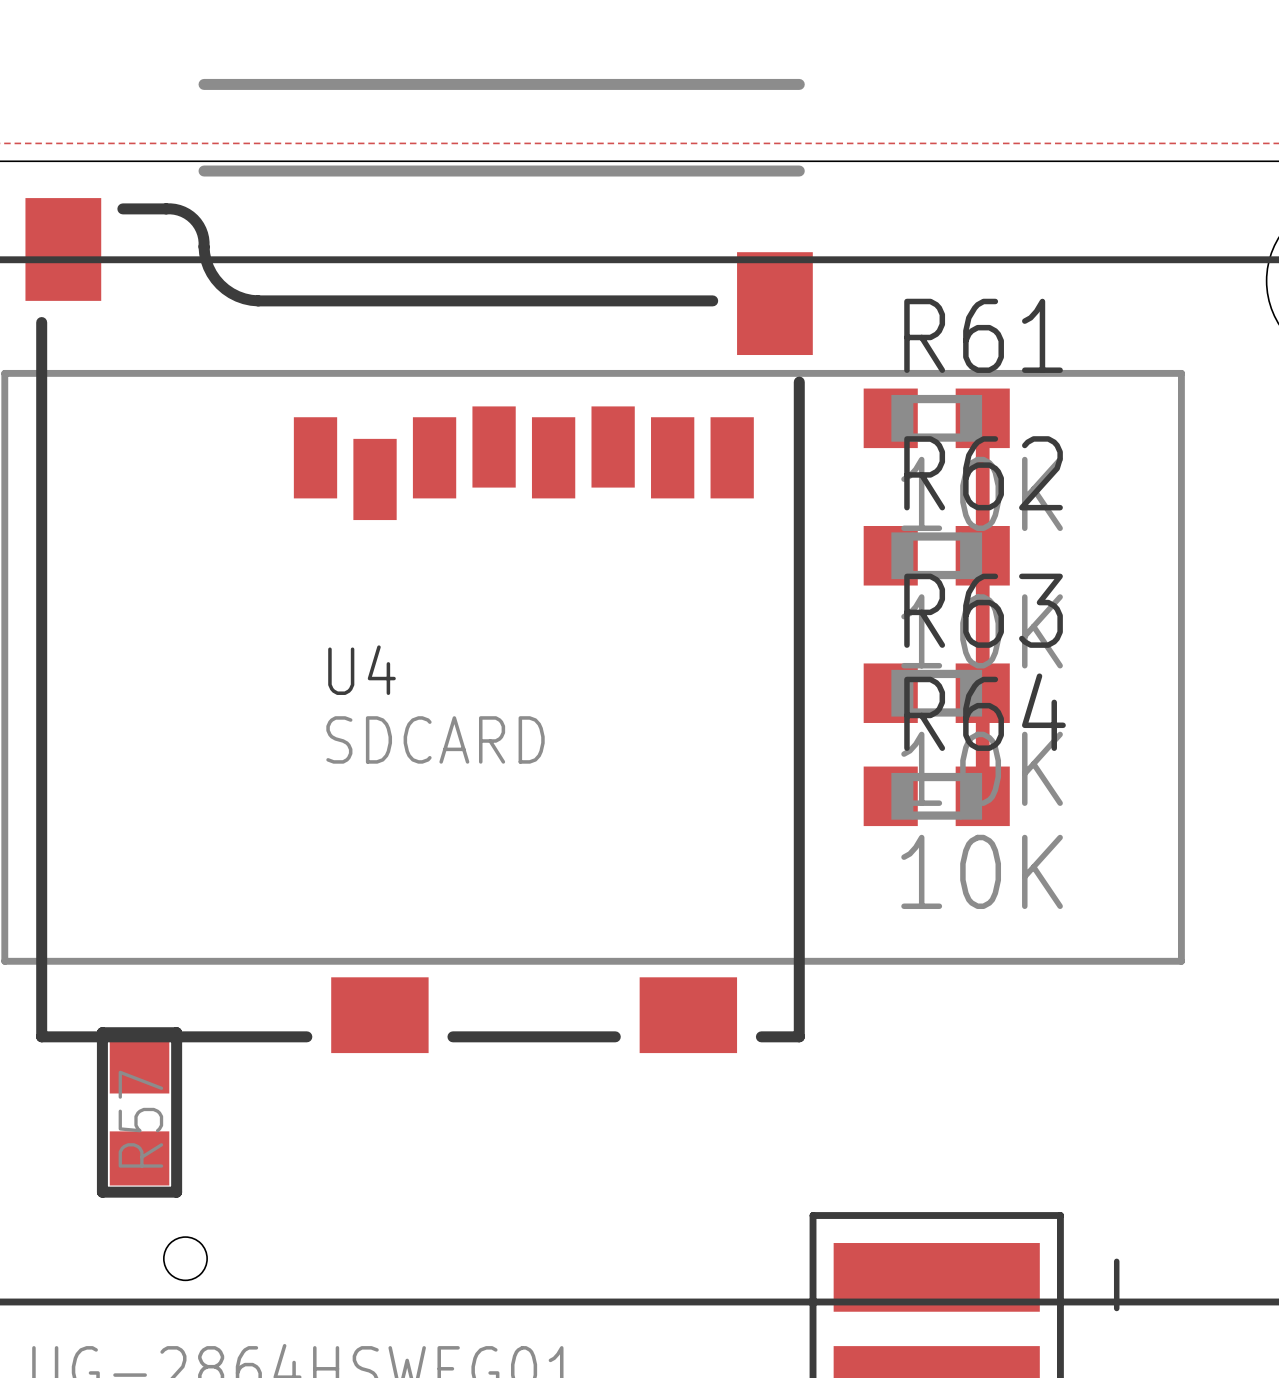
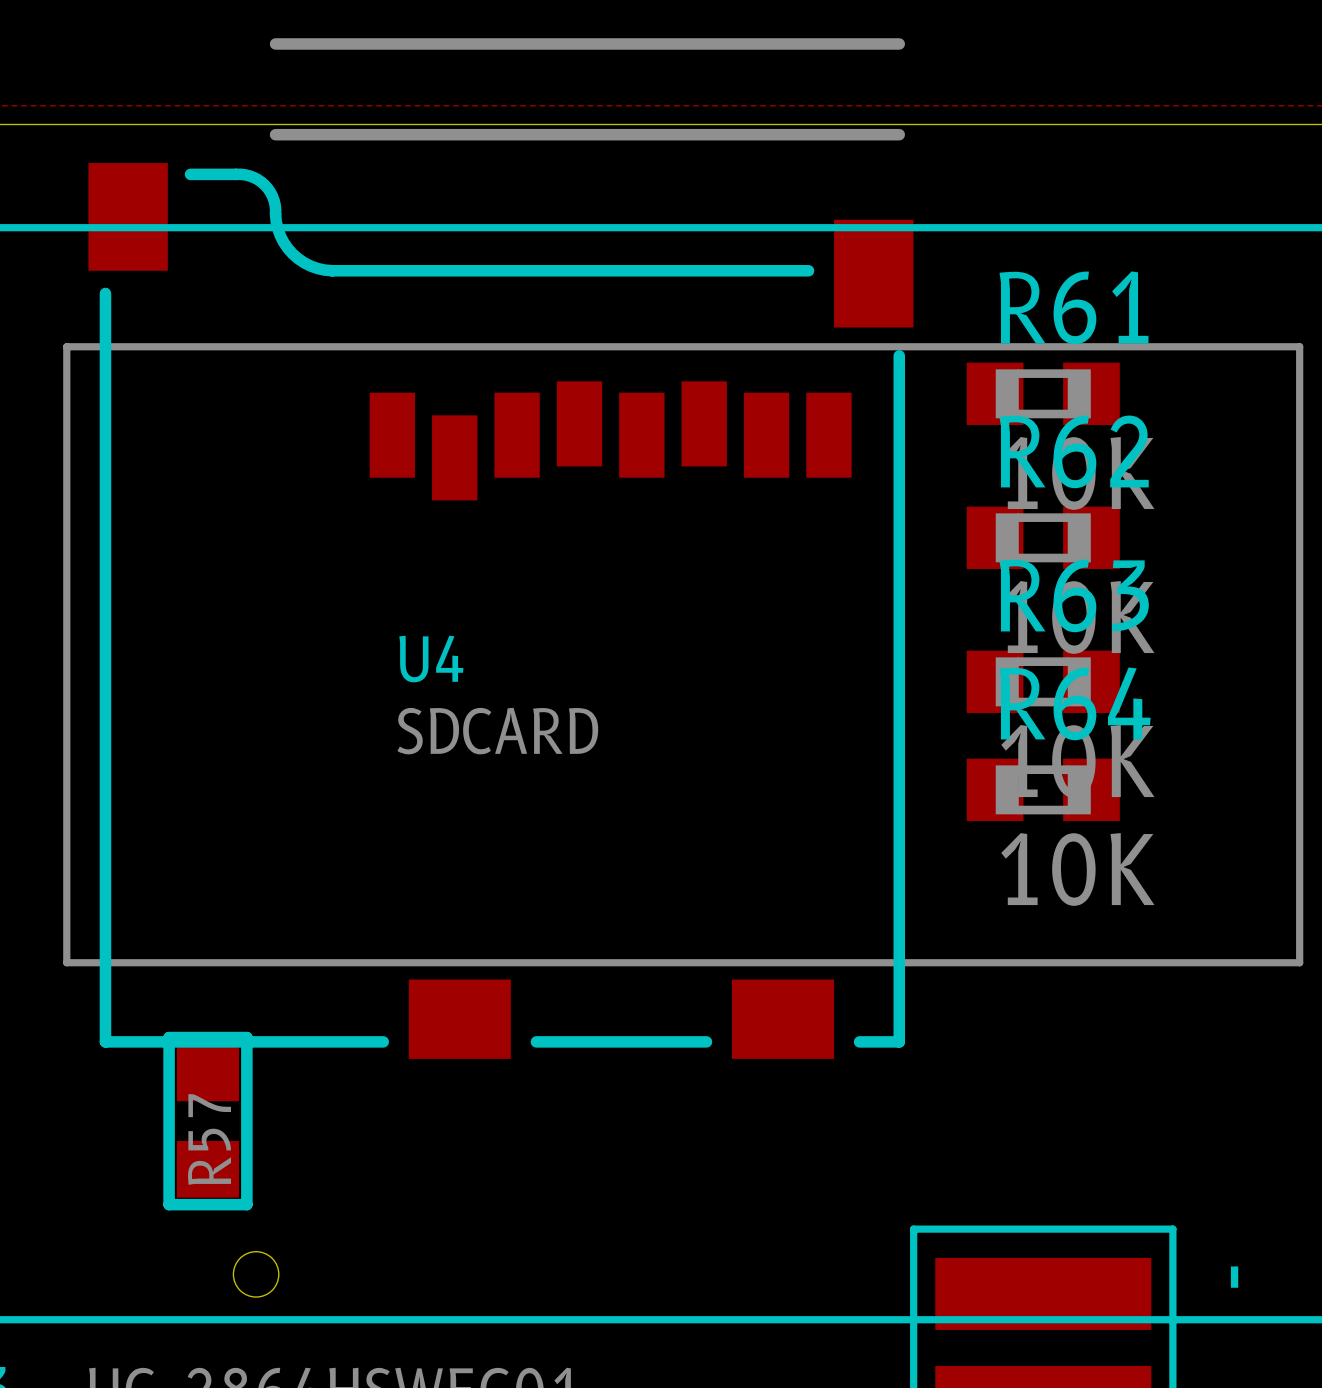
track: (982, 418) (982, 796) -> none

